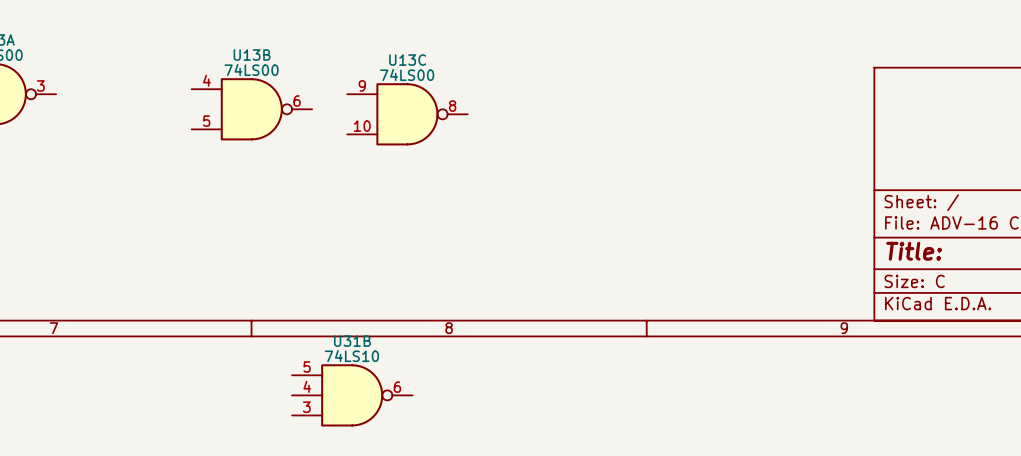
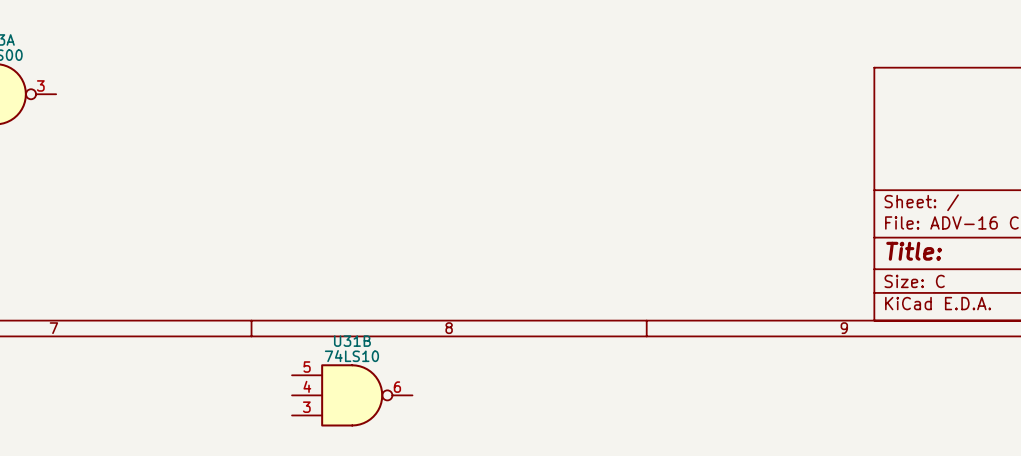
U13B: 74LS00 (251, 109) -> none
U13C: 74LS00 (407, 114) -> none

